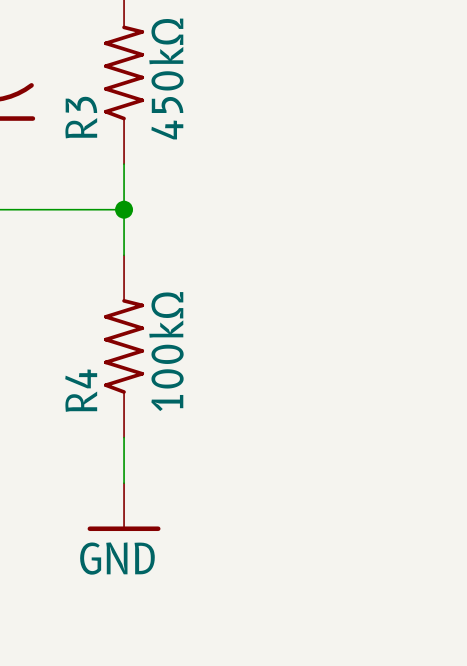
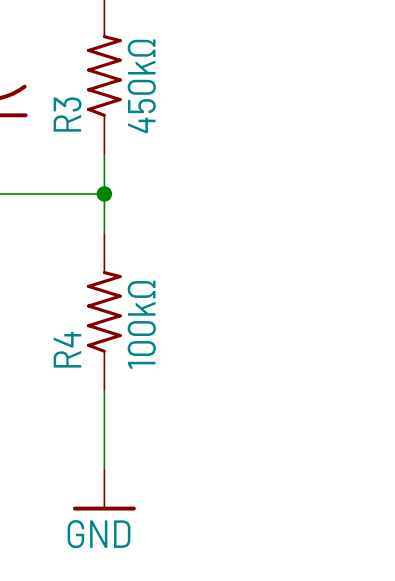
power symbol position: GND (124, 507) -> GND (104, 489)

